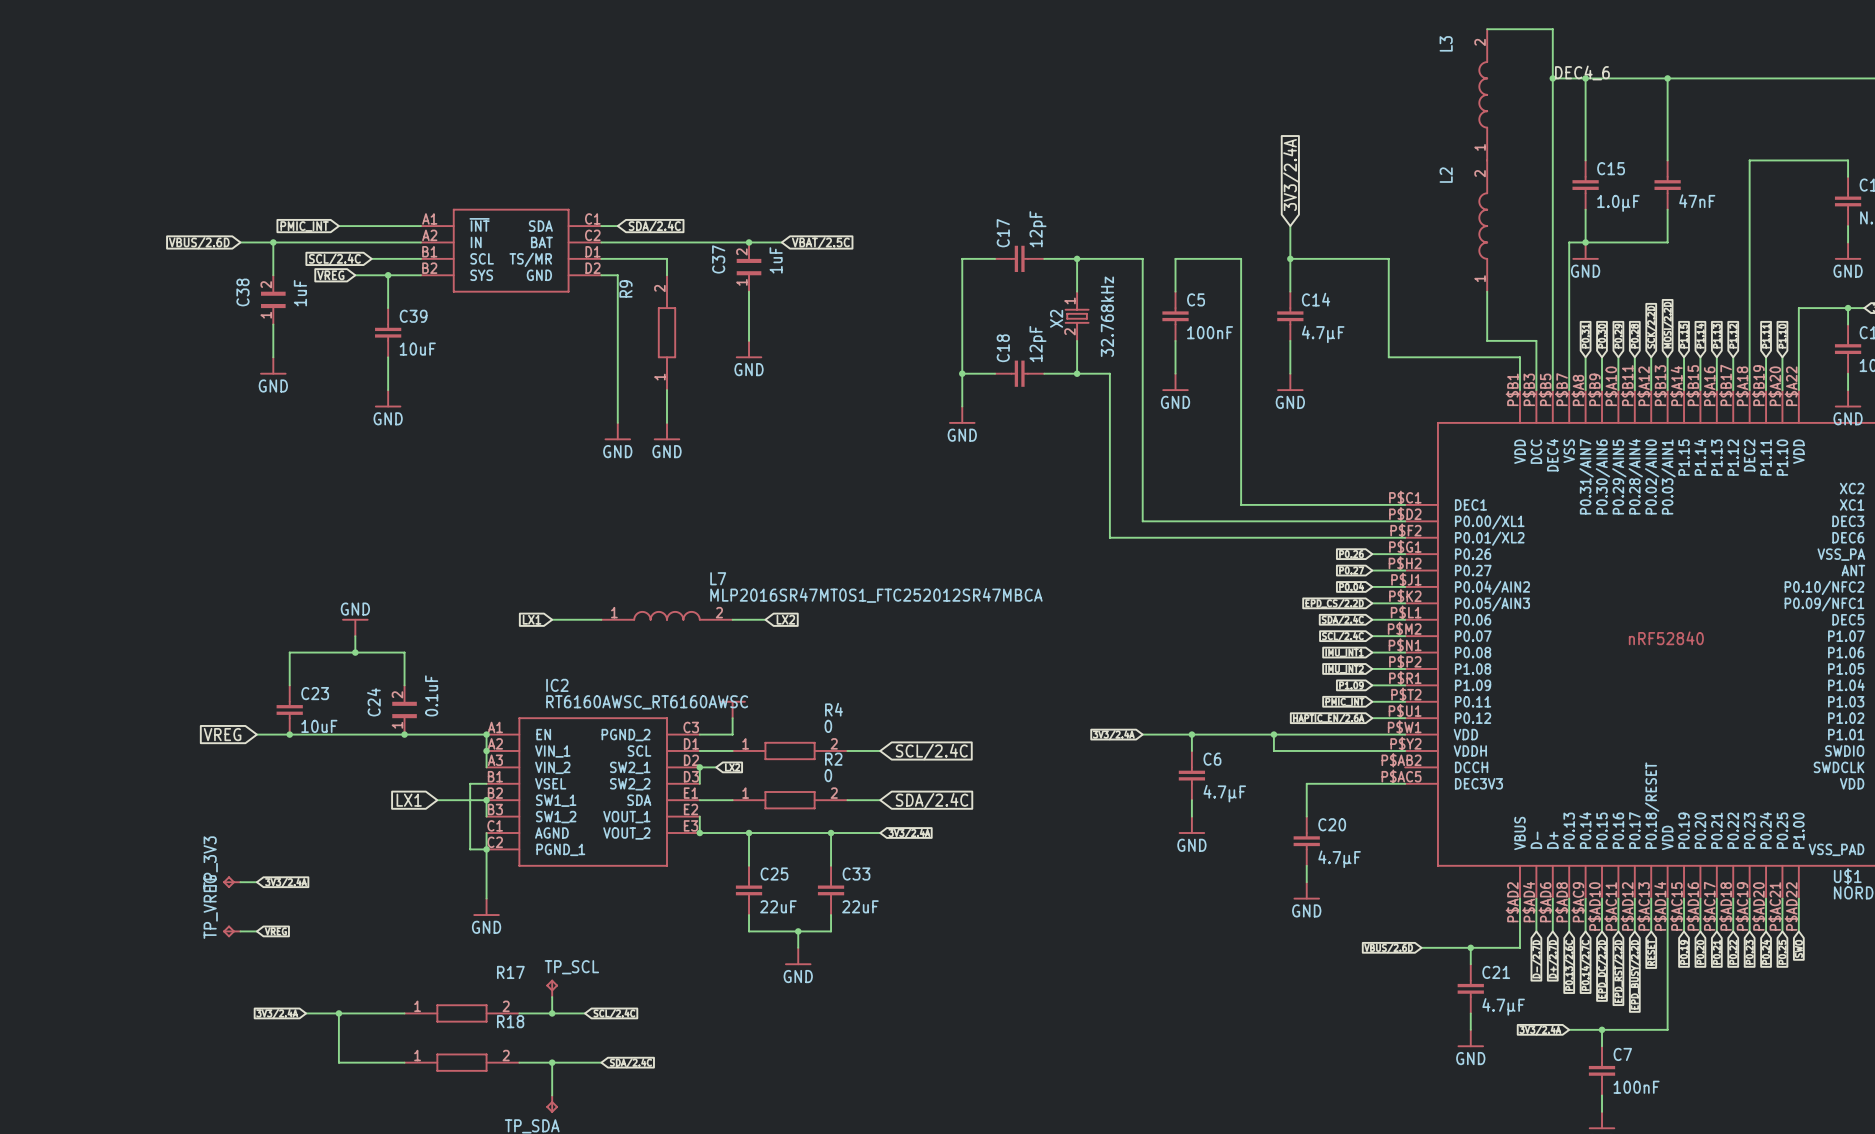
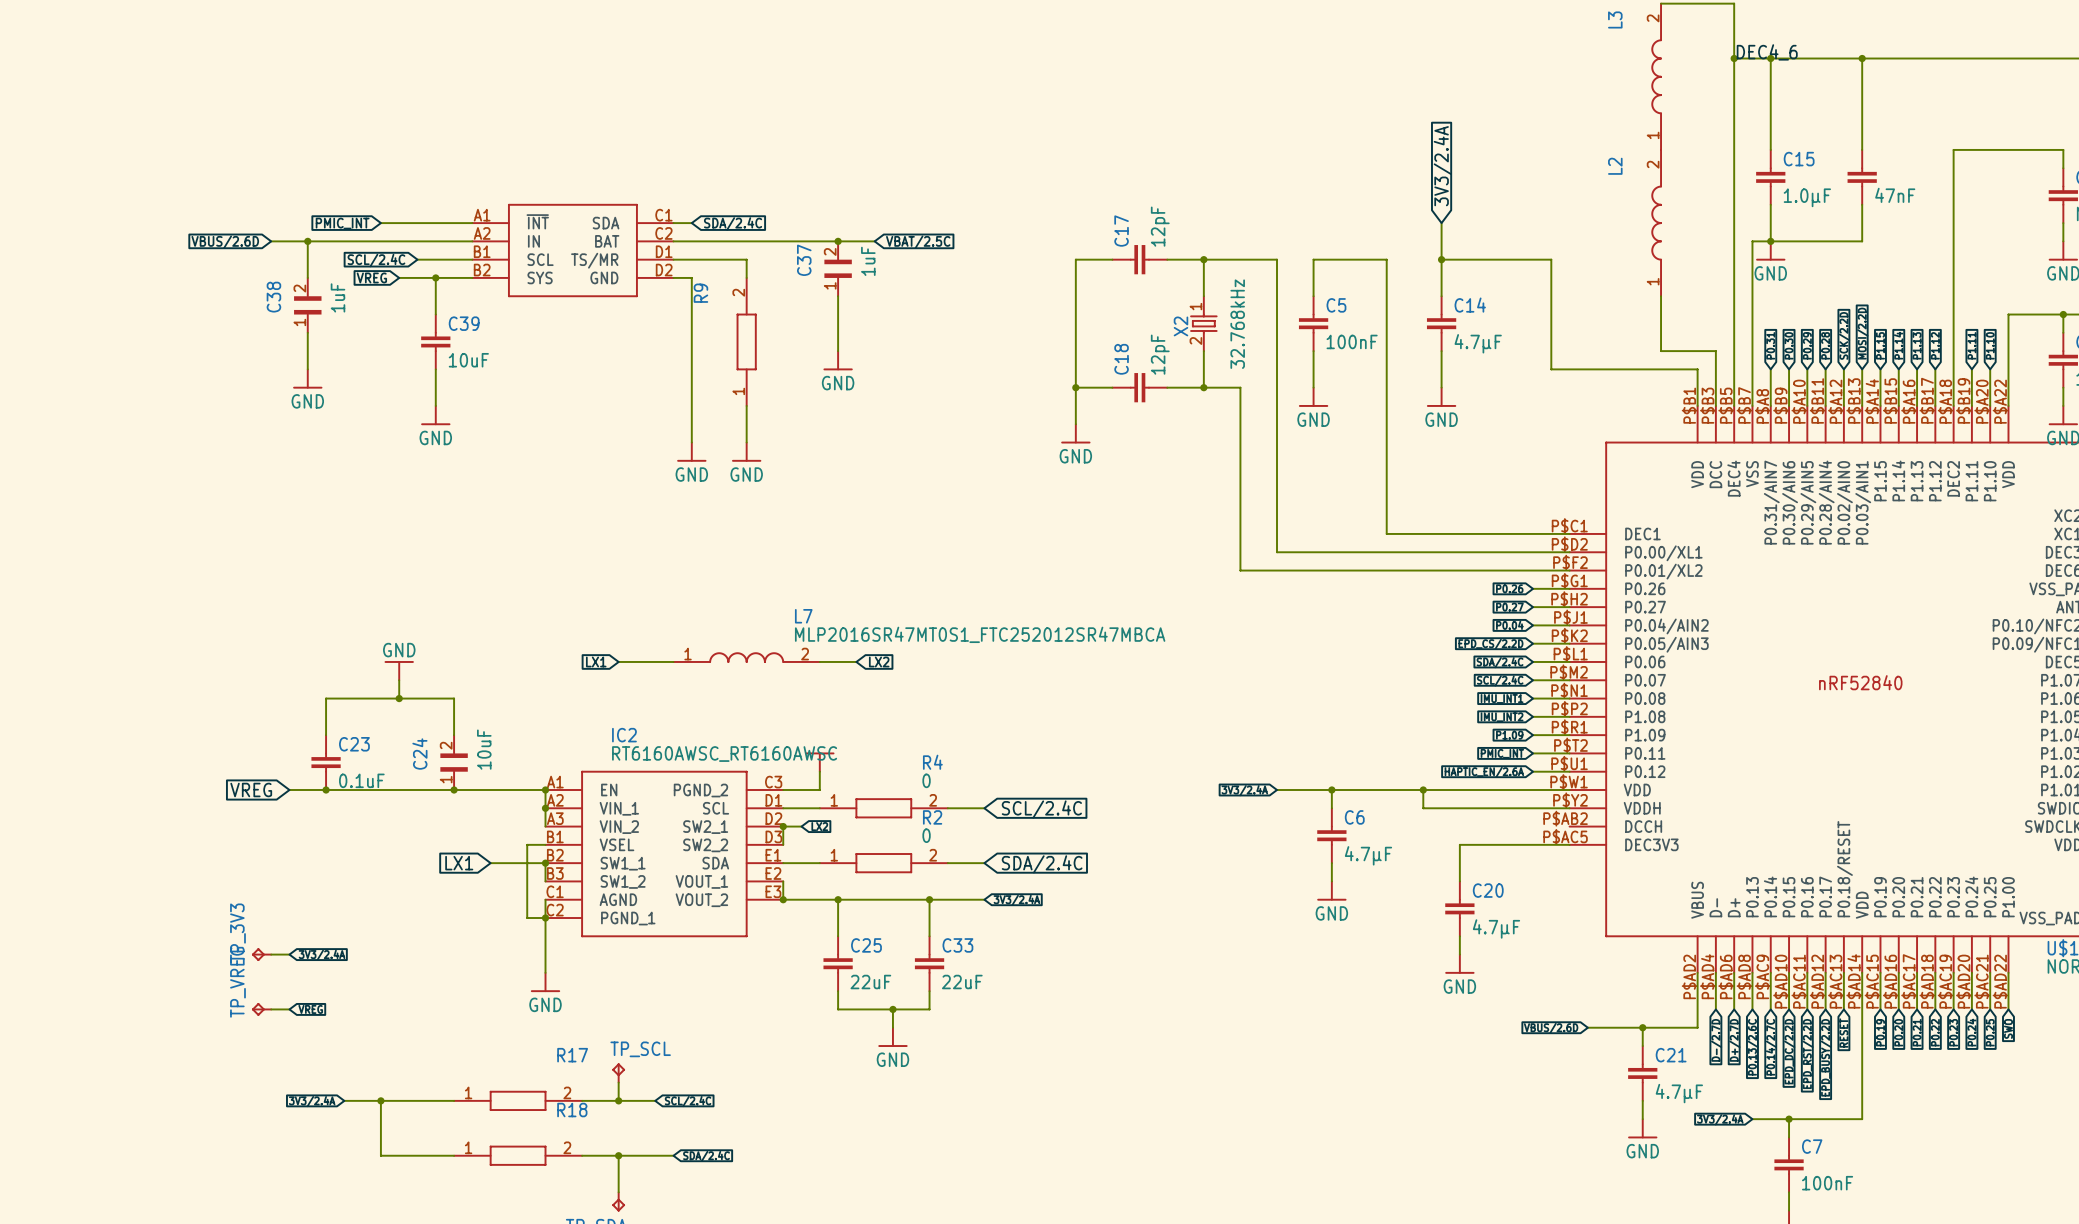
C24 value: 0.1uF (431, 695) -> 10uF (484, 749)
C23 value: 10uF (319, 726) -> 0.1uF (361, 780)

